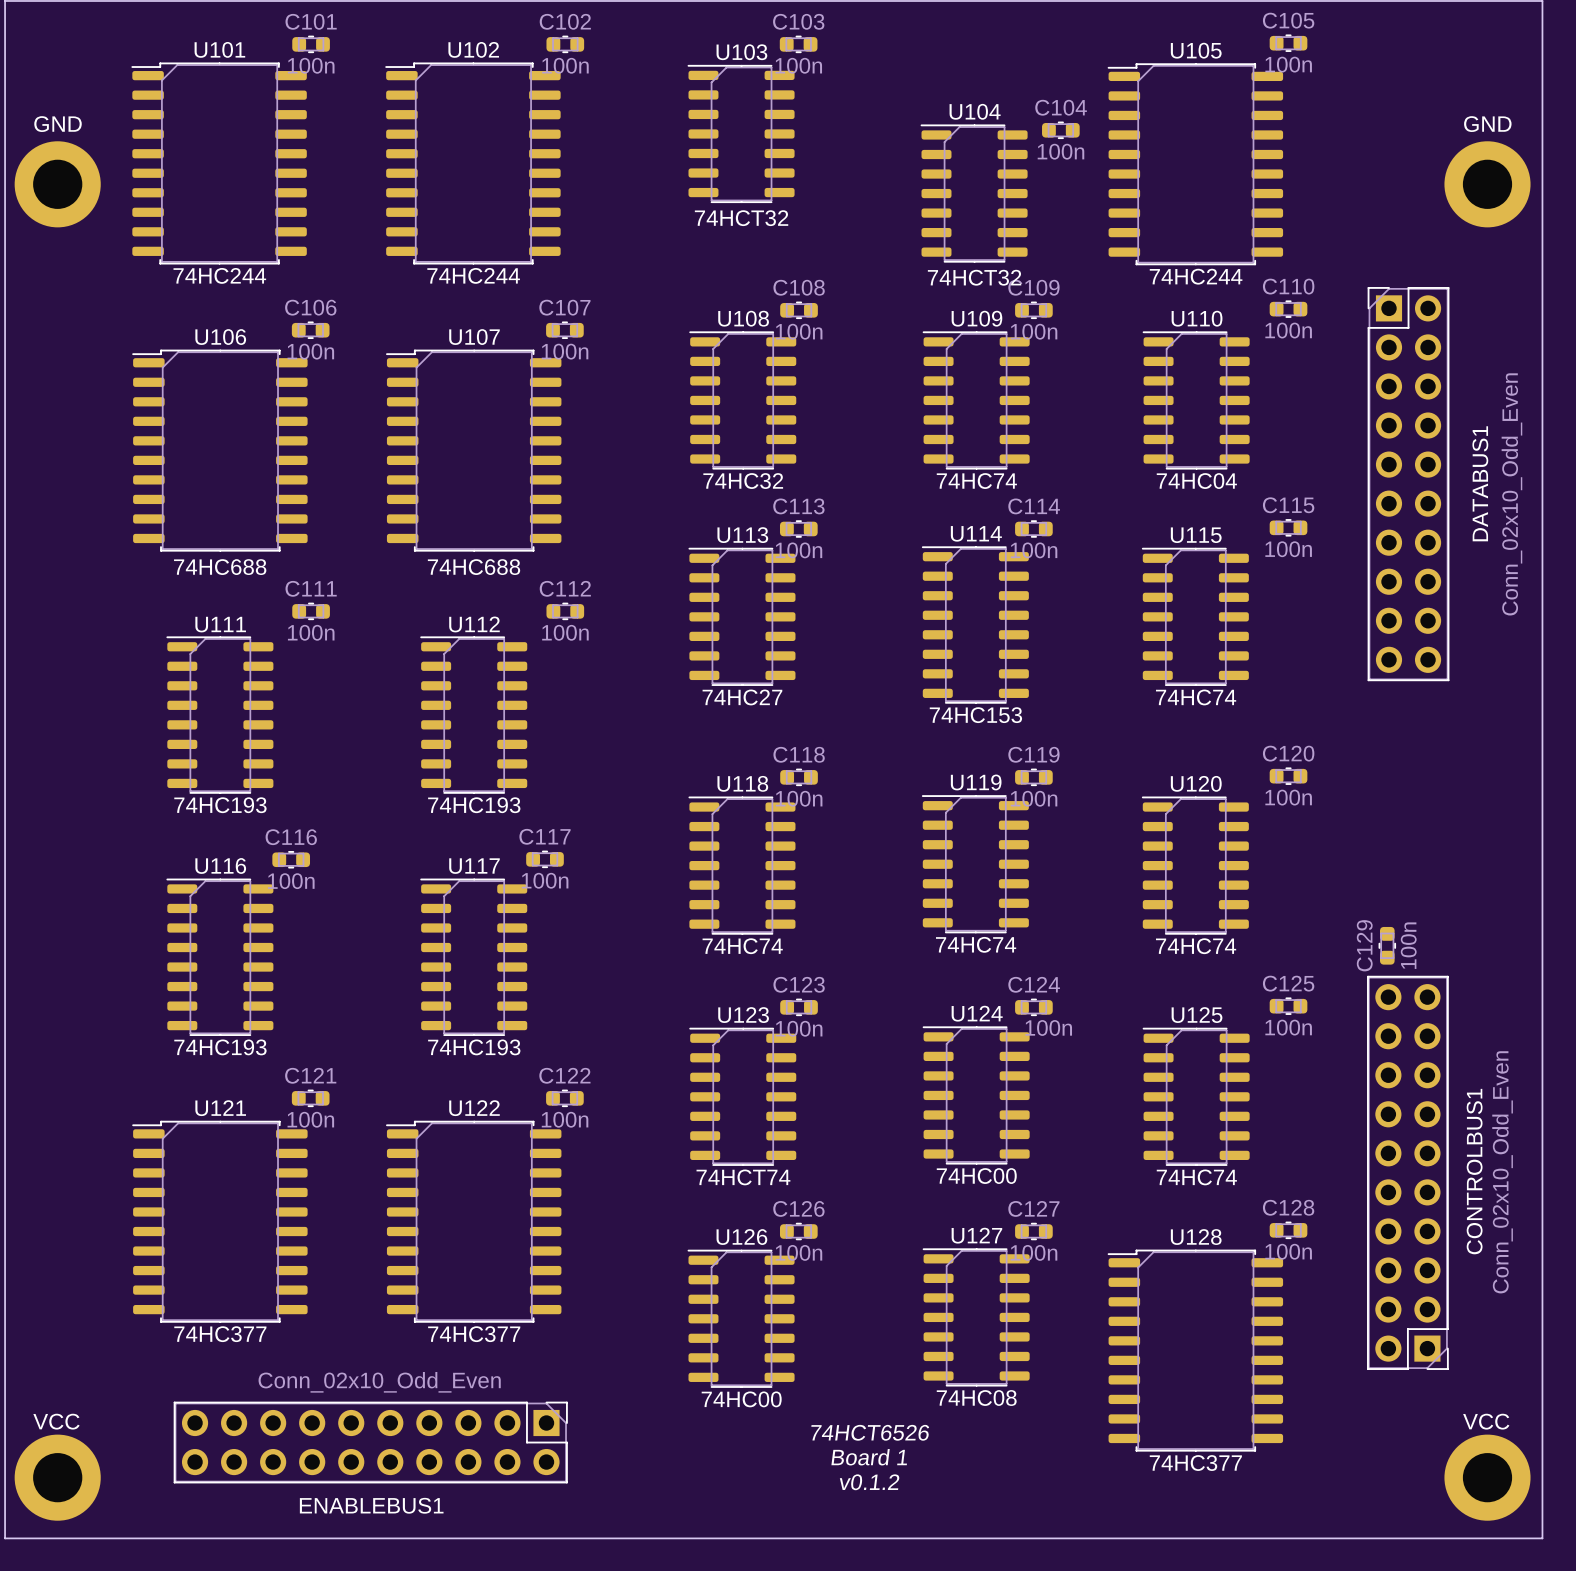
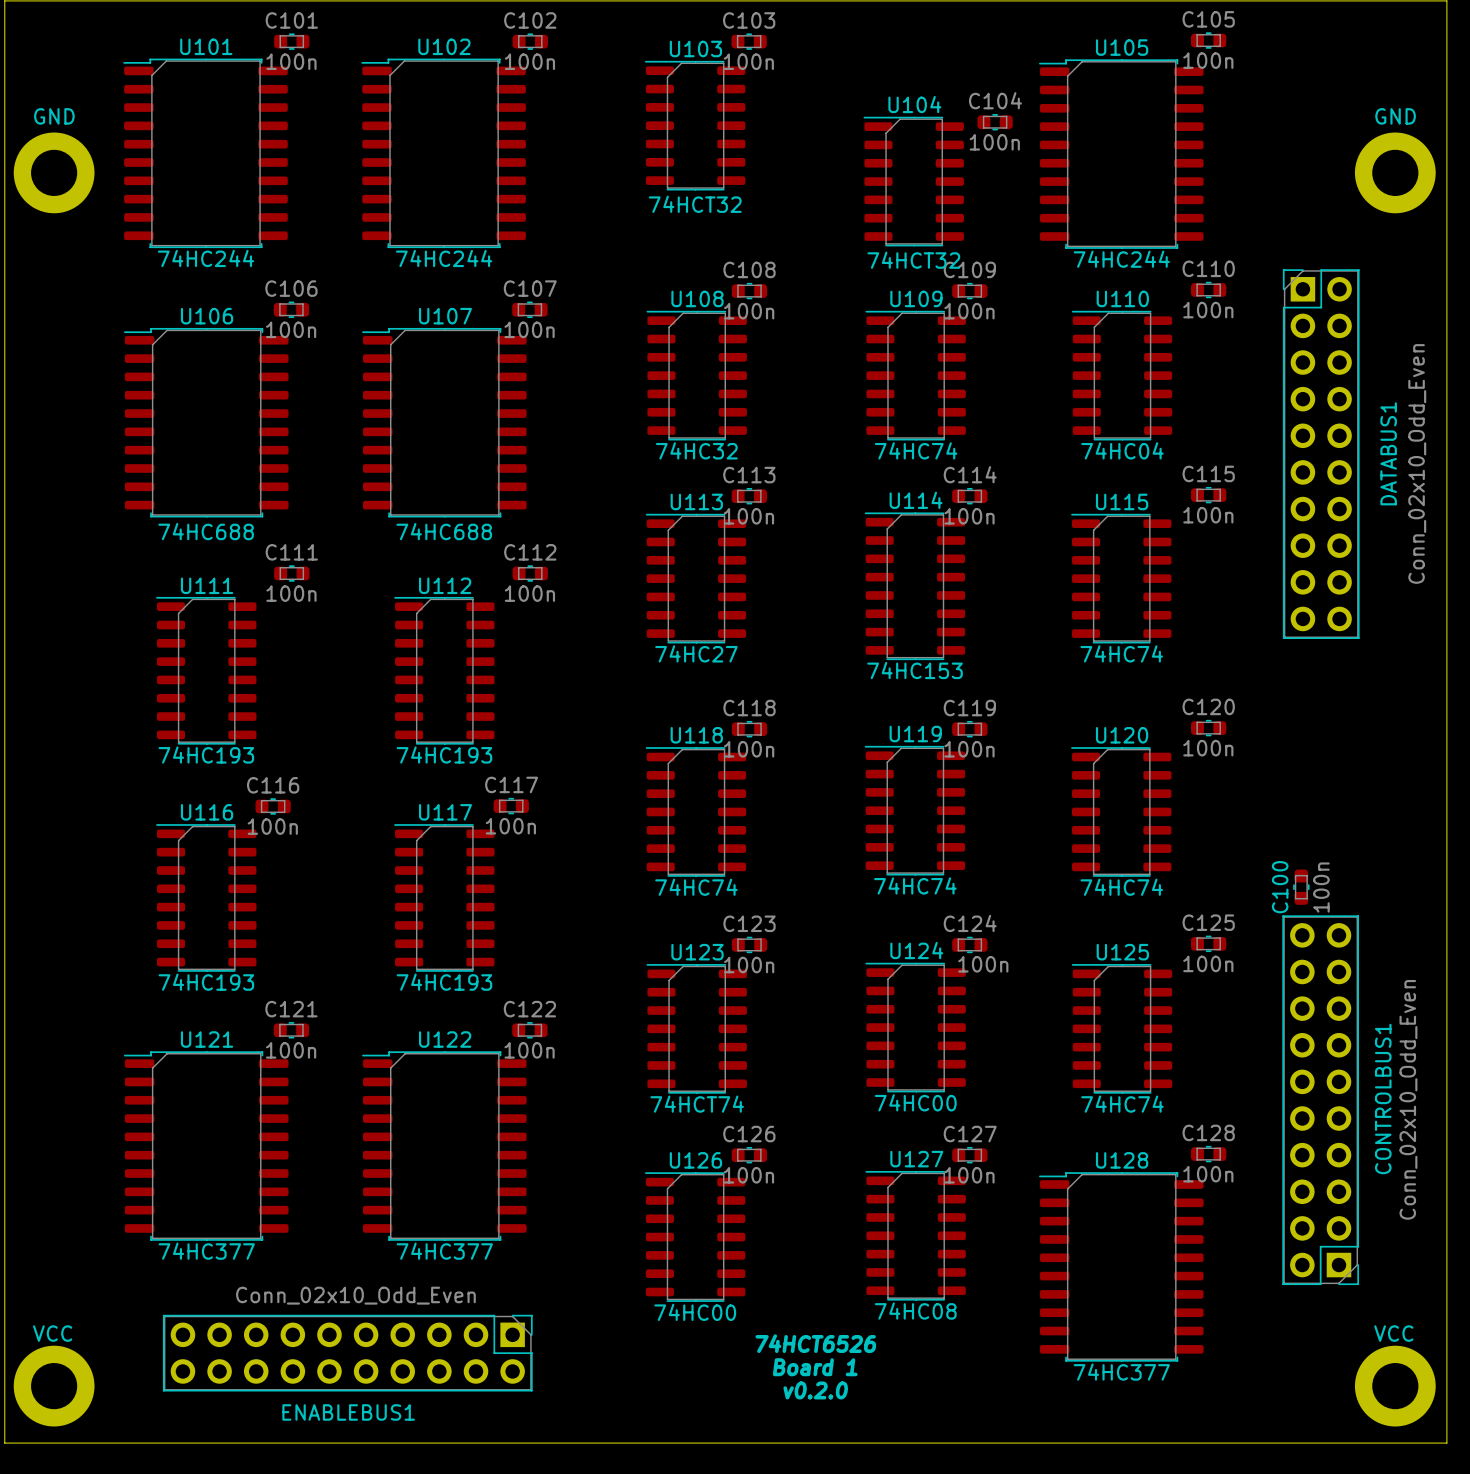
C129 name: C129 (1364, 945) -> C100 (1280, 887)
text: v0.1.2 (869, 1482) -> v0.2.0 (815, 1390)

